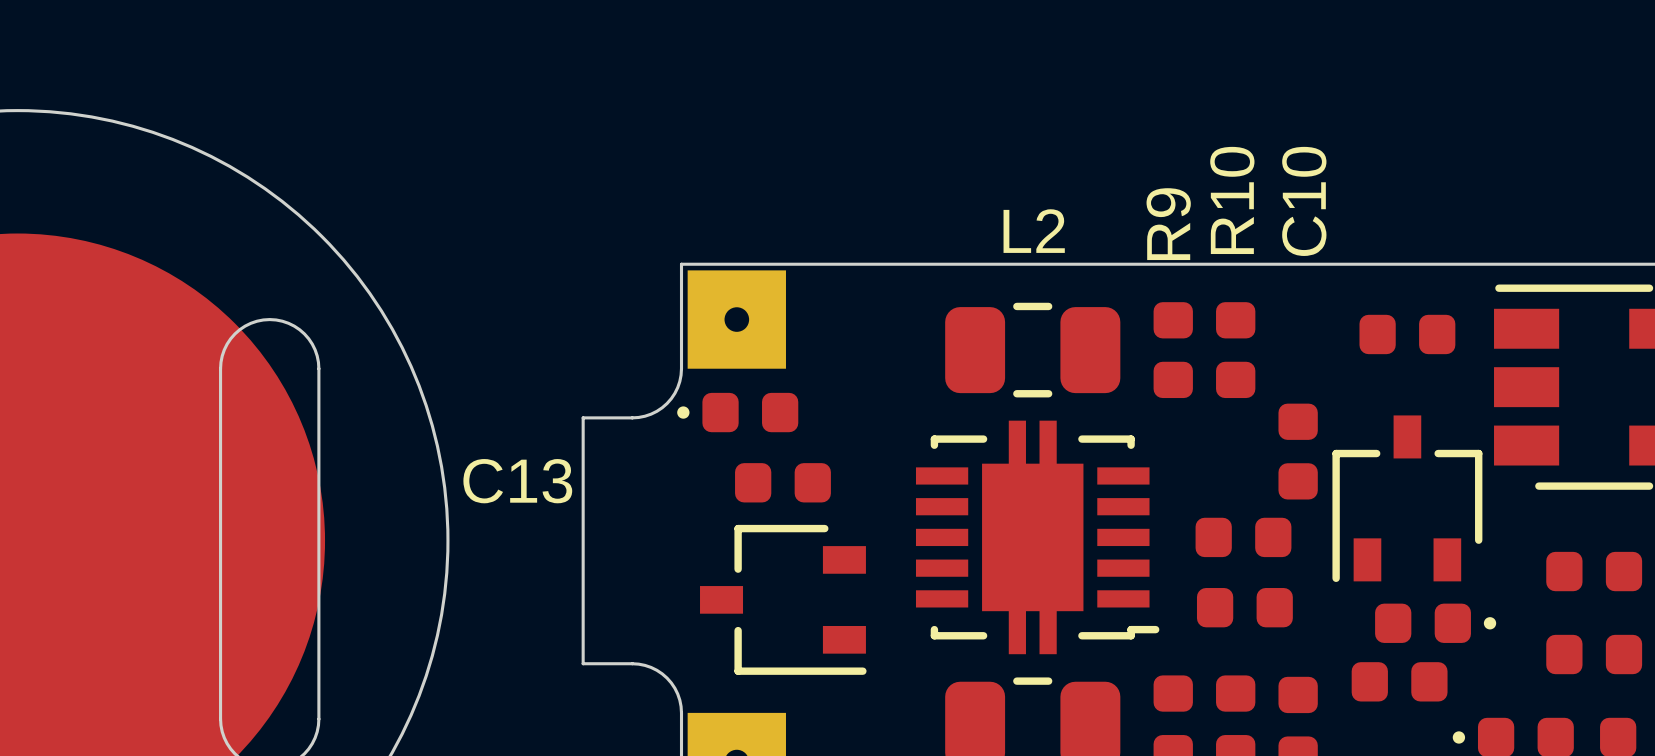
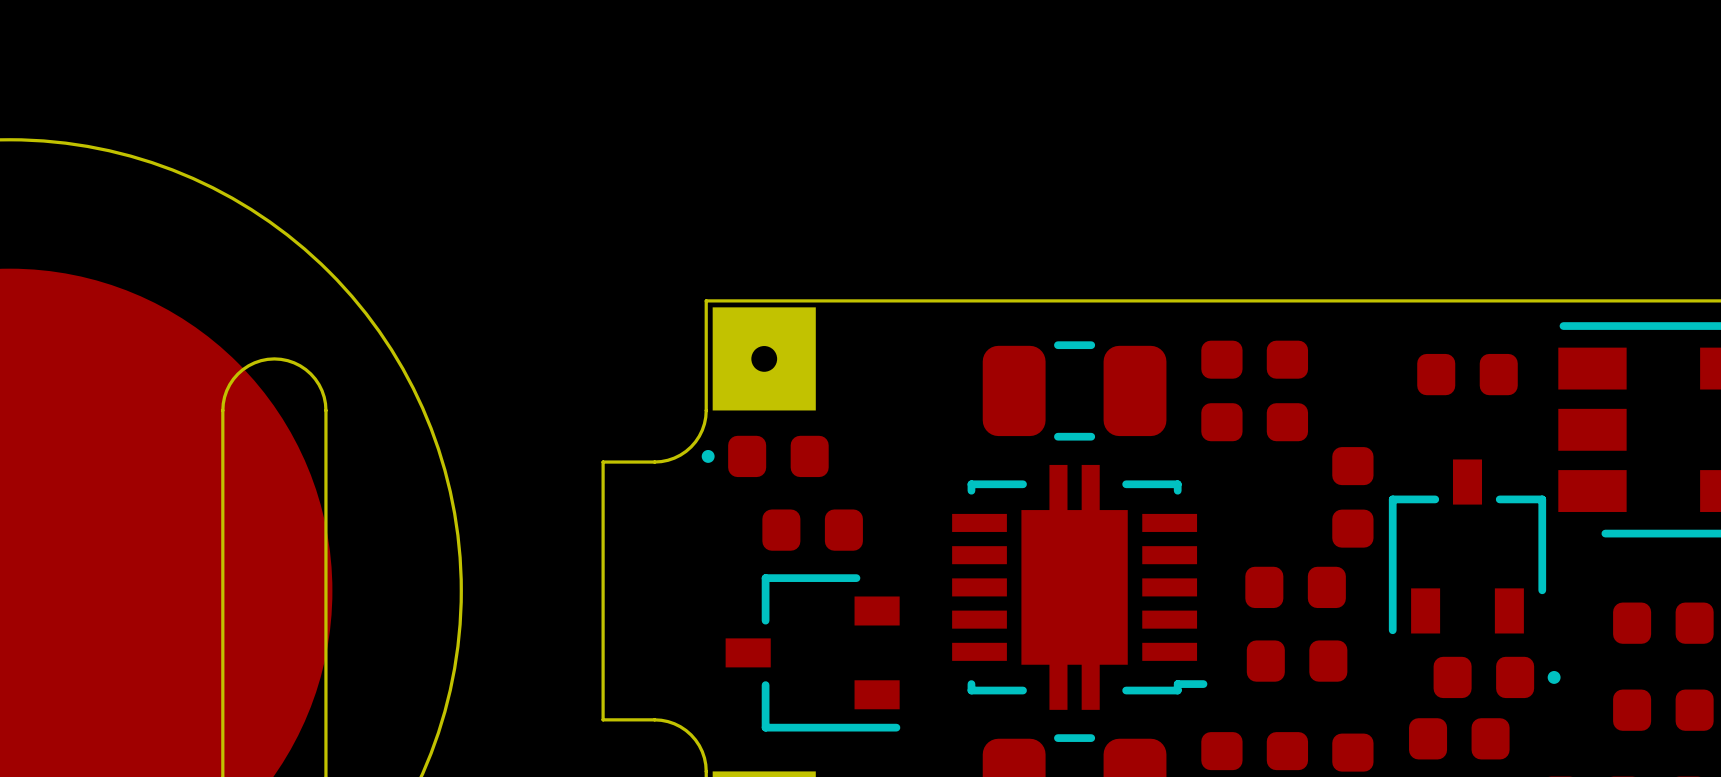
R10 name: R10 (1232, 200) -> none
C10 name: C10 (1304, 201) -> none
R9 name: R9 (1168, 224) -> none
L2 name: L2 (1034, 231) -> none
C13 name: C13 (517, 481) -> none

